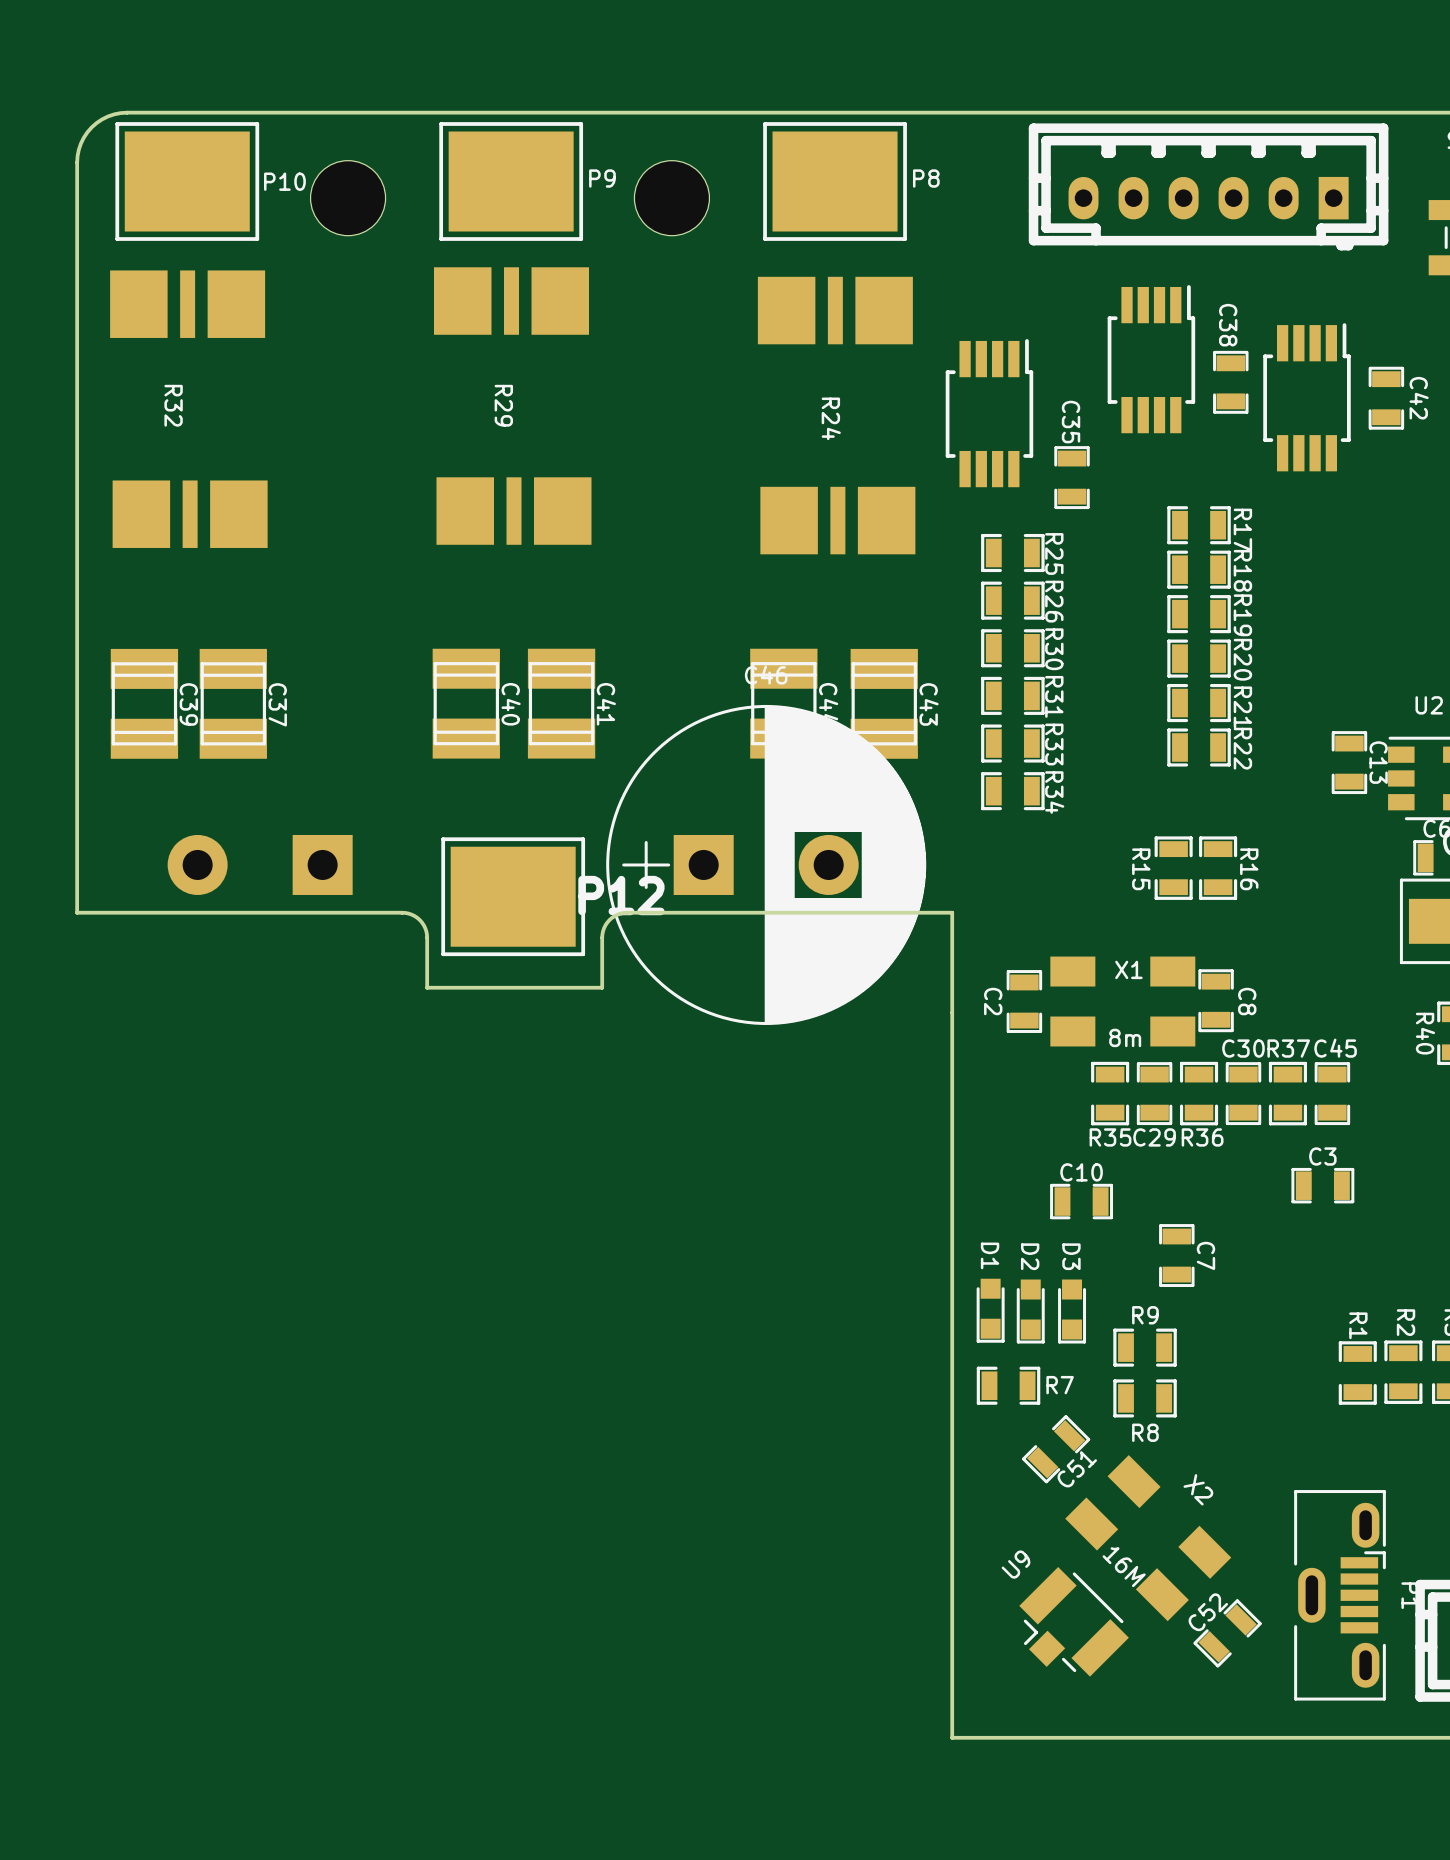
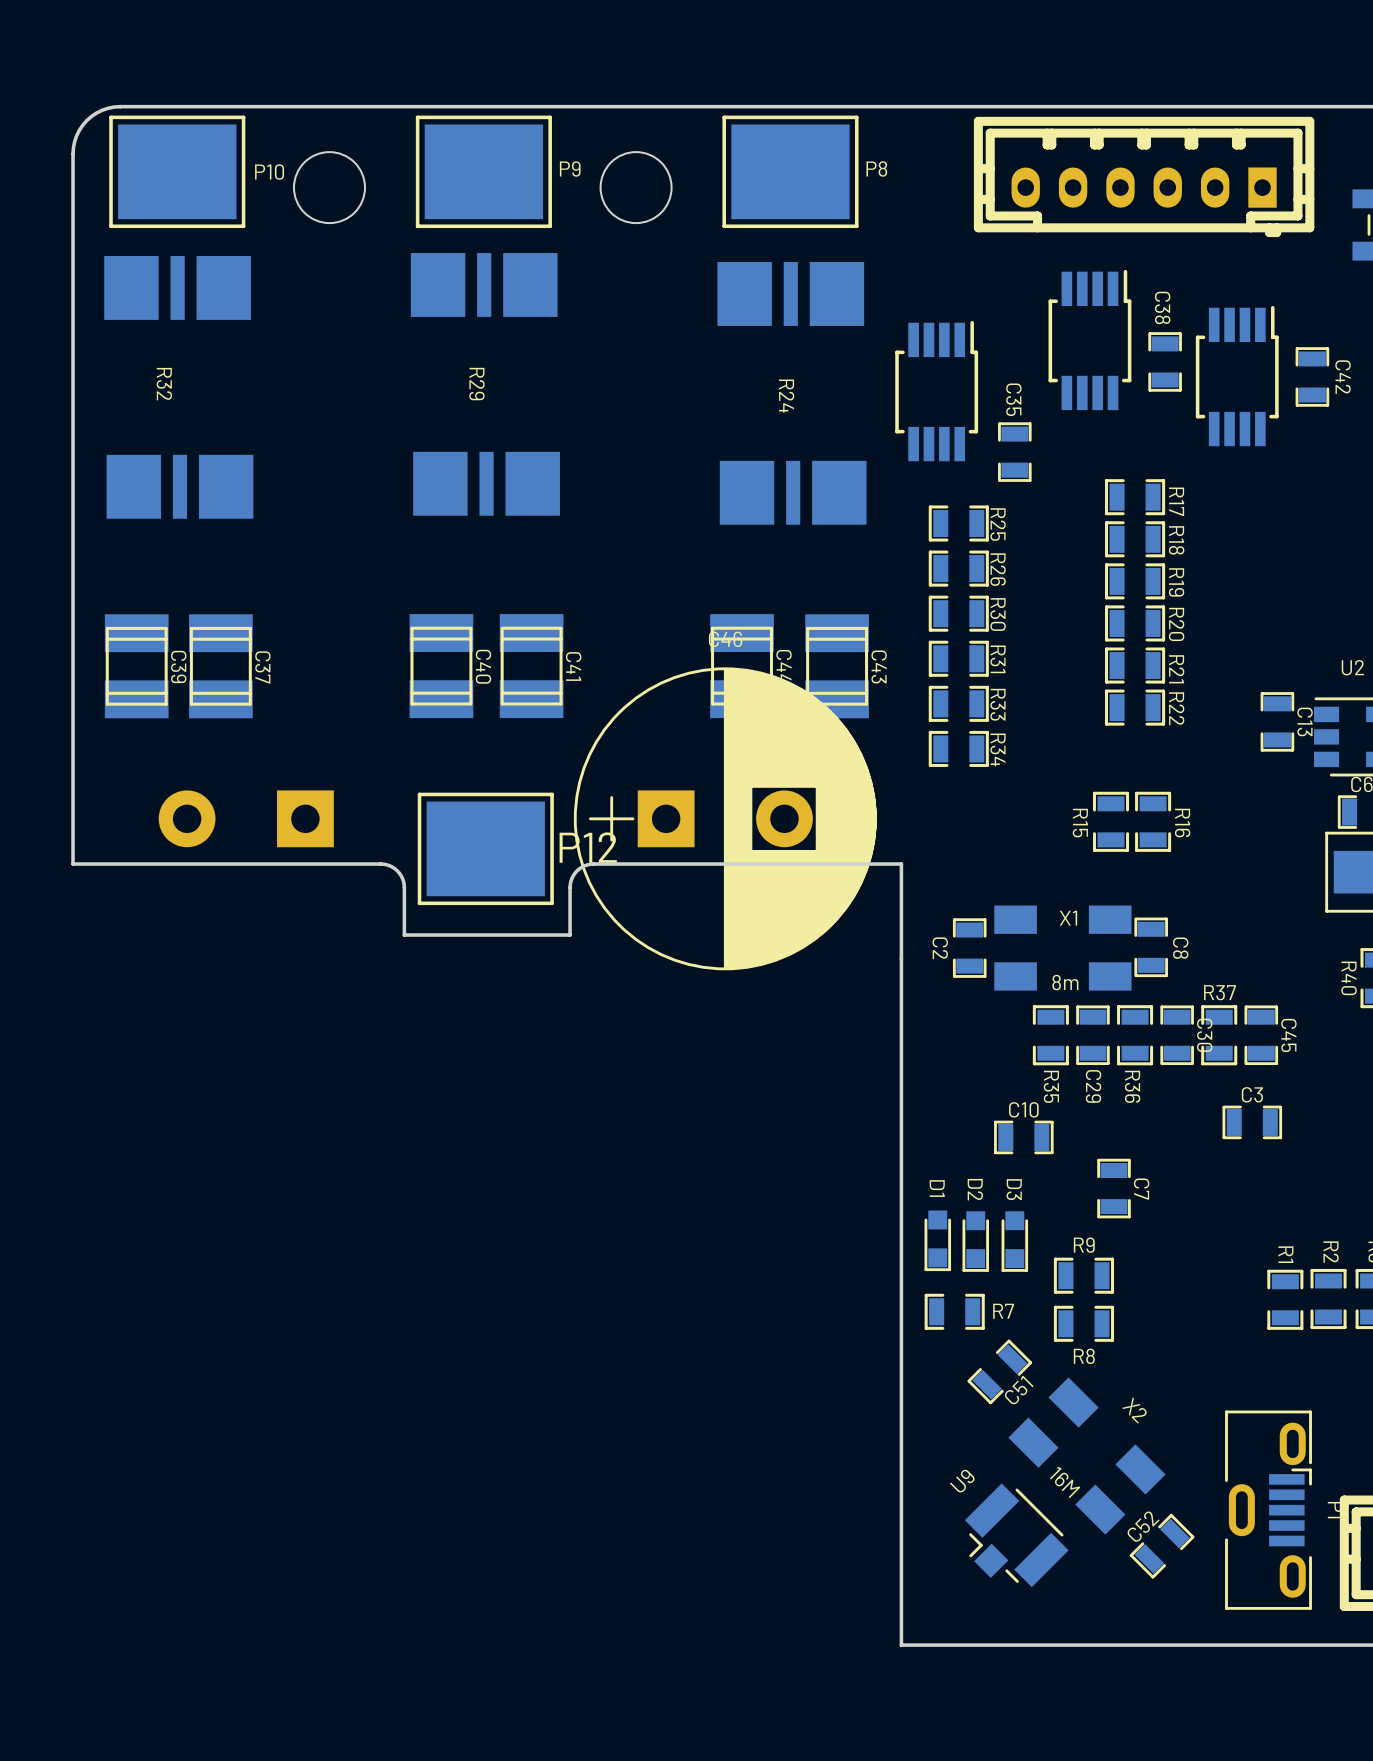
C30 name rotation: 0° (1243, 1048) -> 90° clockwise (1204, 1035)
C45 name rotation: 0° (1335, 1048) -> 90° clockwise (1288, 1035)
R35 name rotation: 0° (1110, 1137) -> 90° clockwise (1051, 1086)
C29 name rotation: 0° (1154, 1137) -> 90° clockwise (1093, 1086)
R36 name rotation: 0° (1202, 1137) -> 90° clockwise (1132, 1086)

